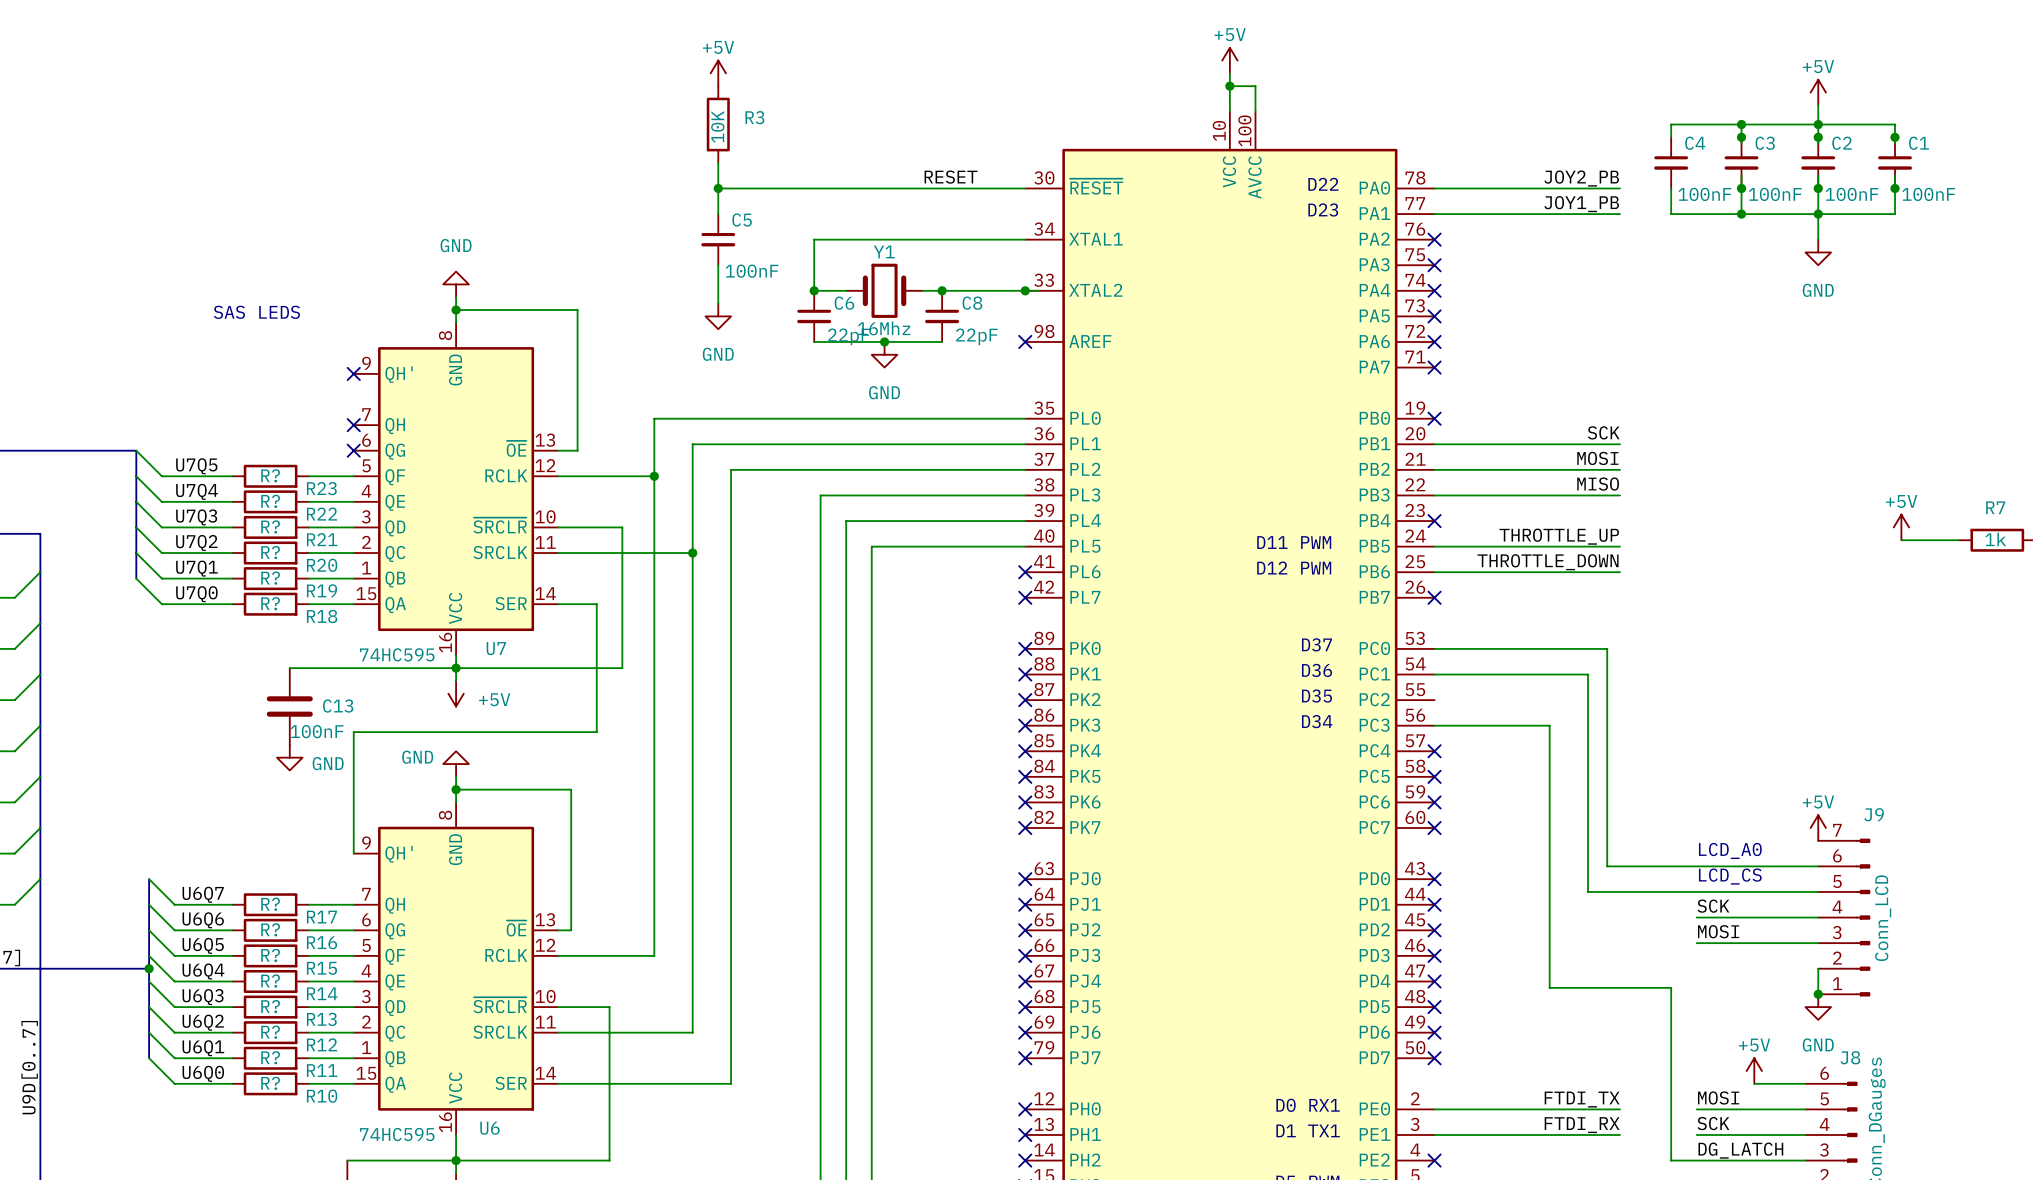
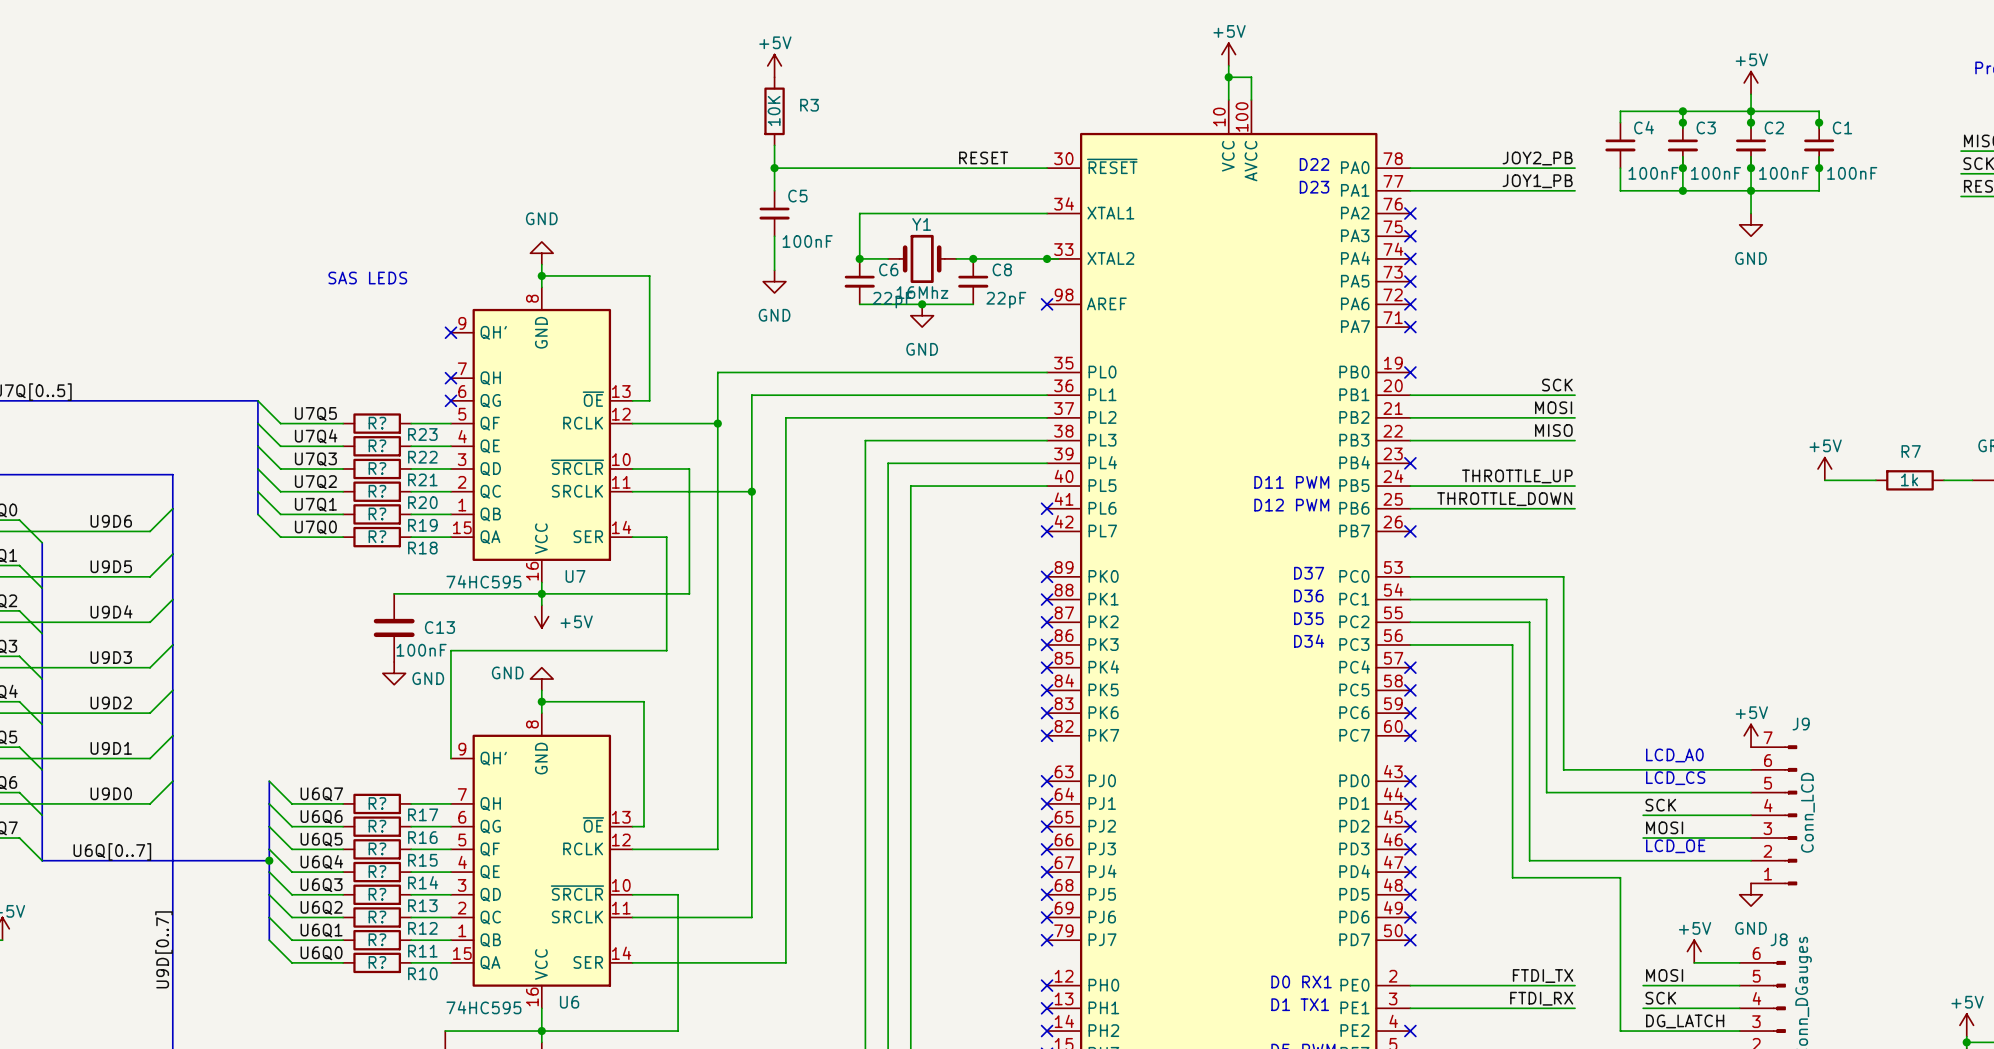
text: none -> LCD_OE (1675, 846)
wire: (1818, 968) (1818, 994) -> (1751, 860) (1529, 860) (1529, 622) (1410, 622)
junction: (1818, 994) -> none

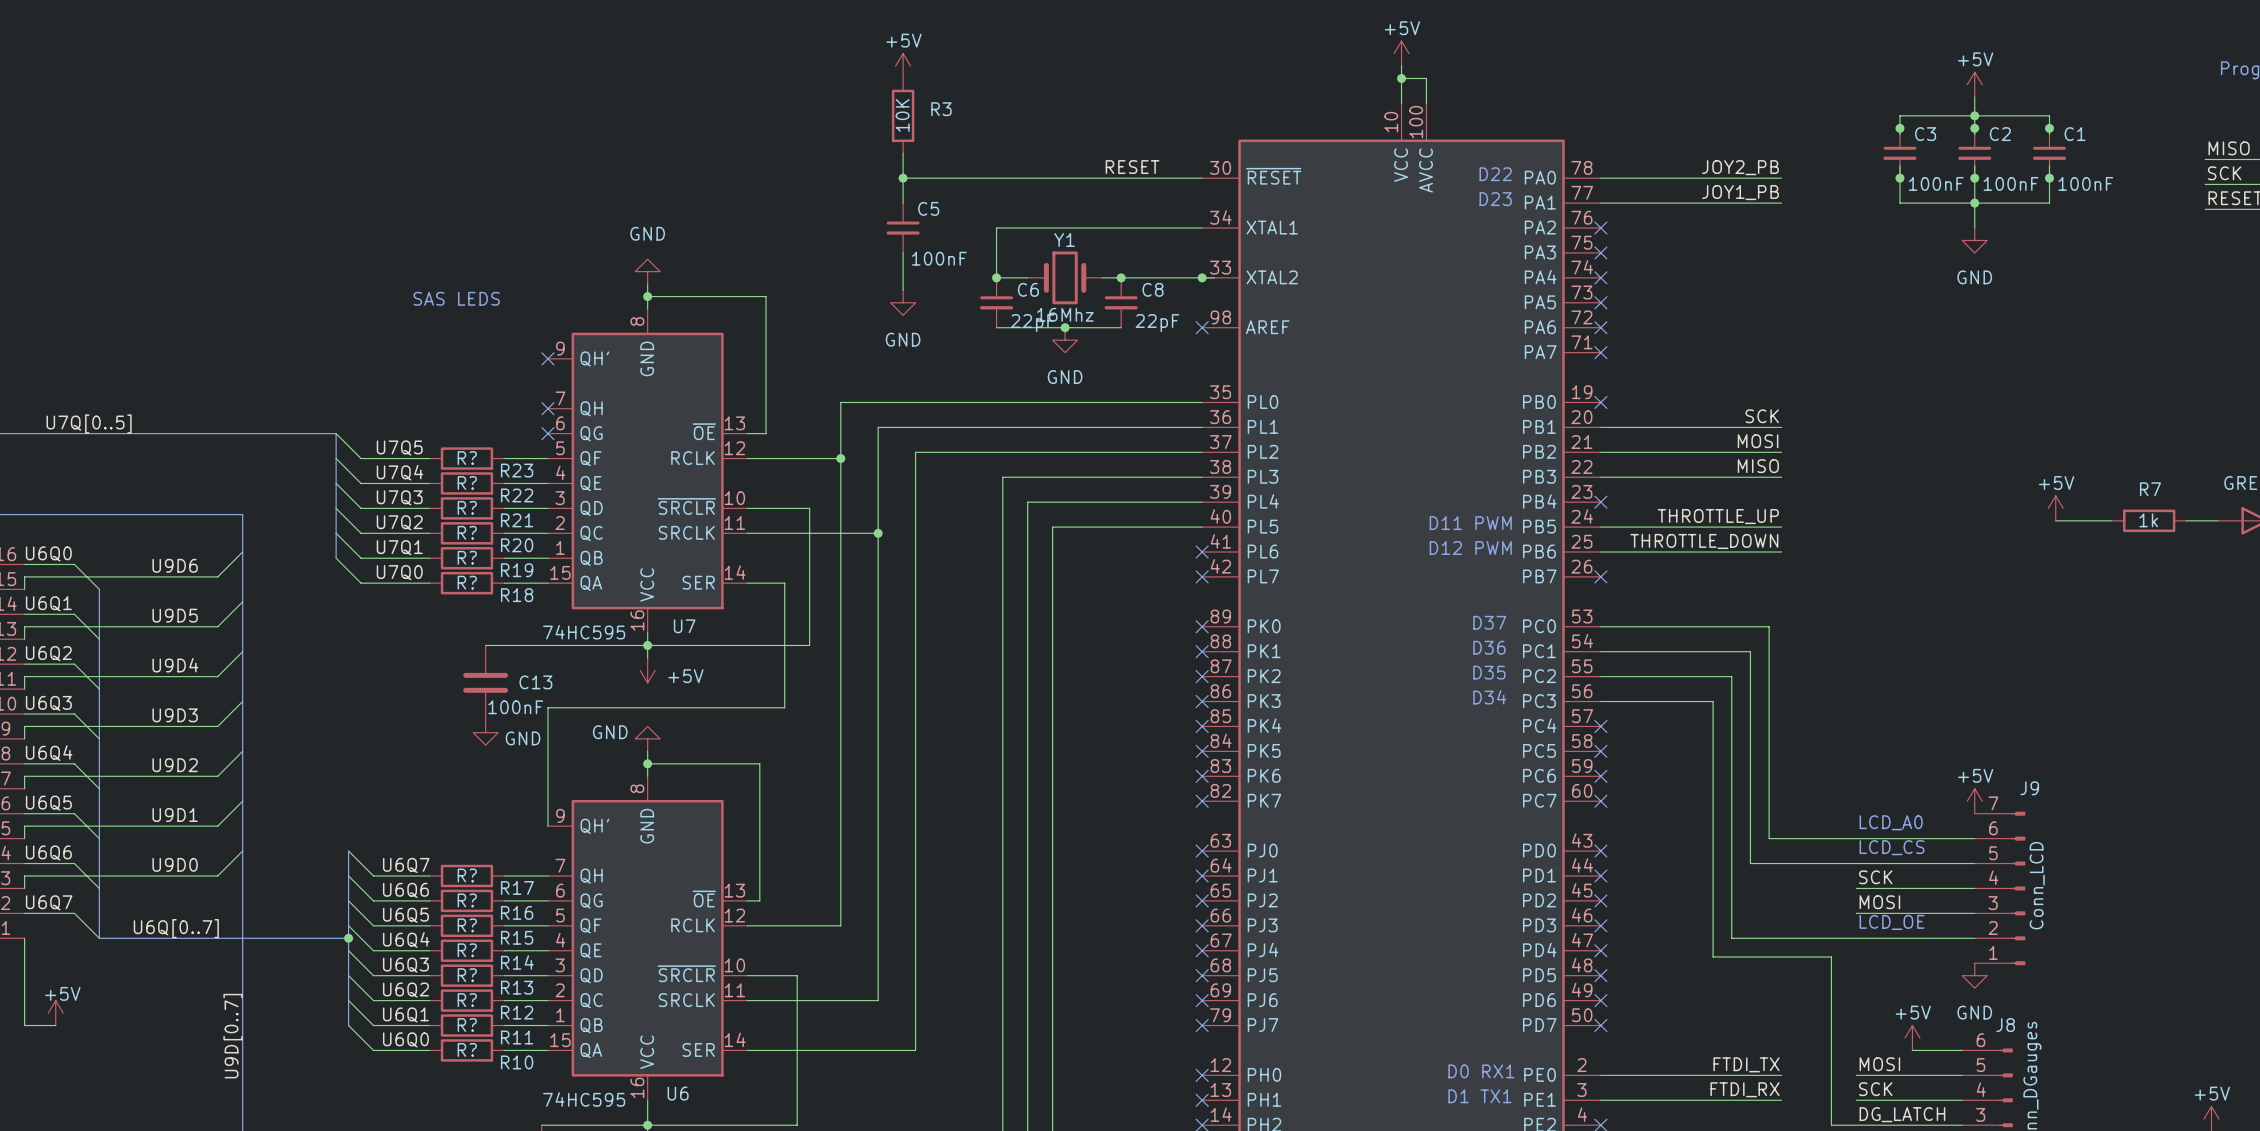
wire: (1682, 111) (1620, 111) (1620, 122) -> none
junction: (1682, 111) -> none
C4: 100nF (1620, 145) -> none
wire: (1620, 168) (1620, 190) (1682, 190) -> none
junction: (1682, 190) -> none

